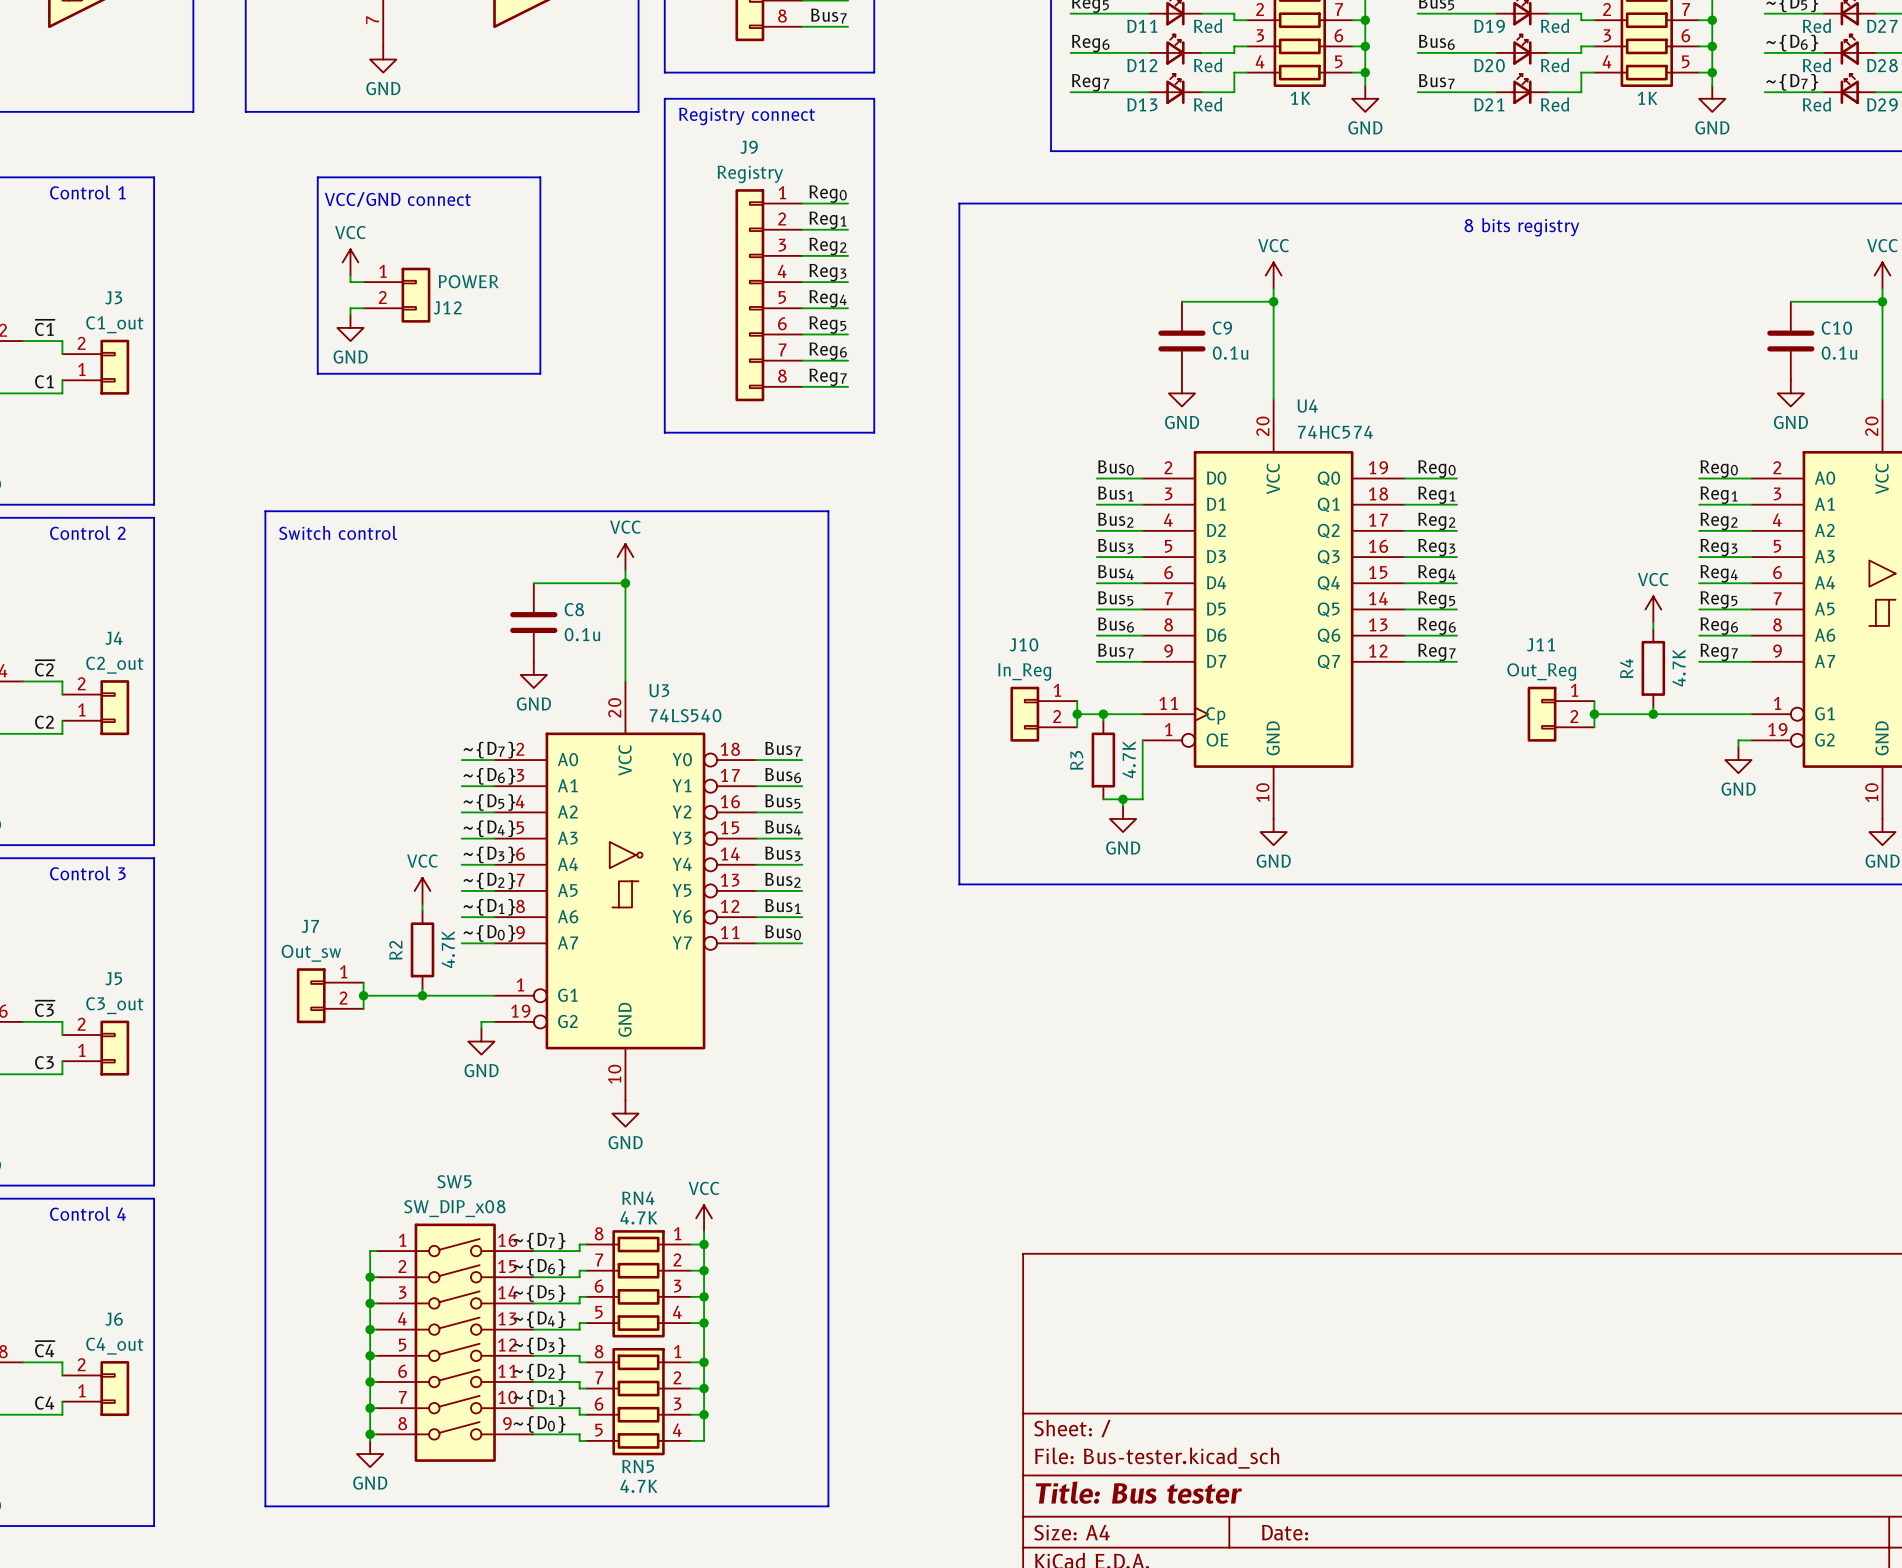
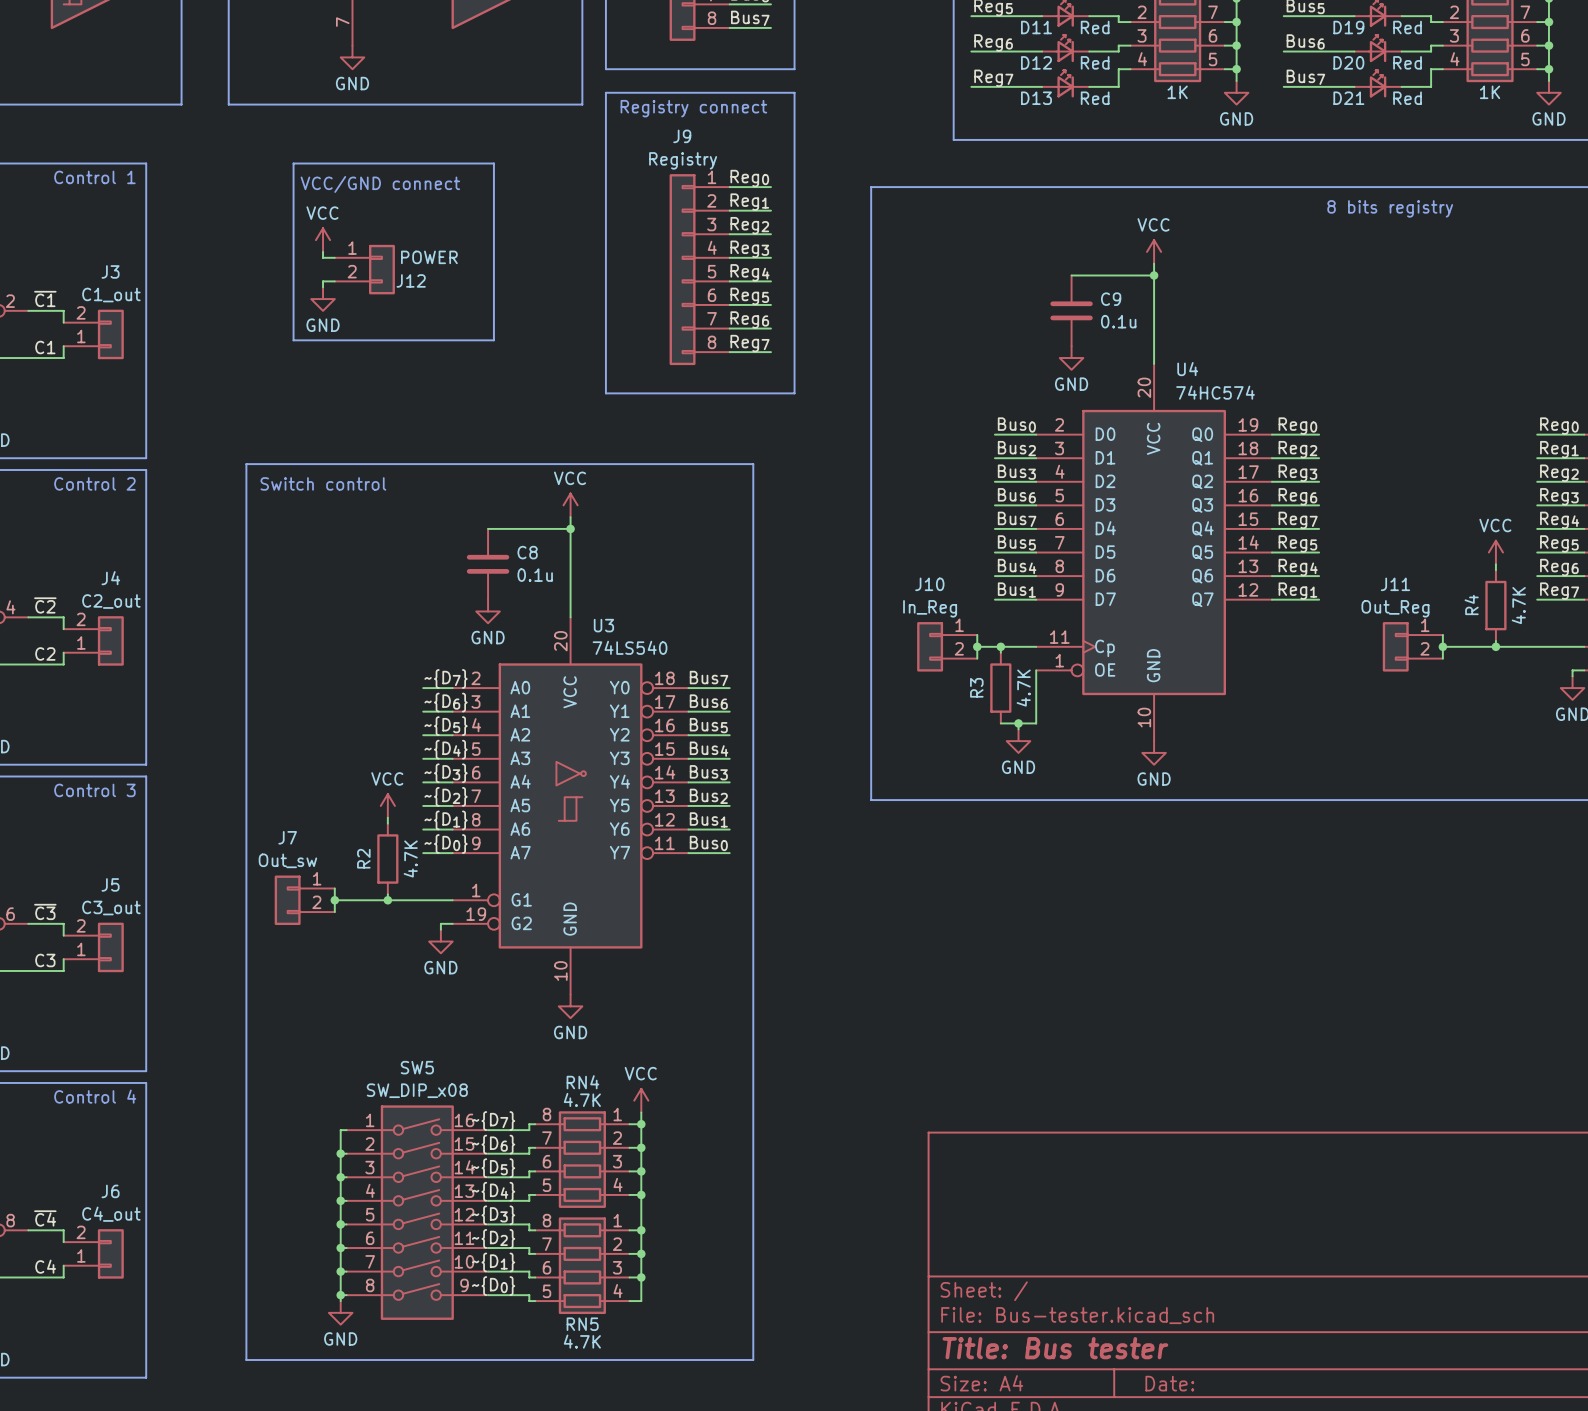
label: Bus1 (1115, 494) -> Bus2 (1016, 448)
label: Reg1 (1436, 495) -> Reg2 (1297, 449)
label: Bus2 (1115, 520) -> Bus3 (1016, 472)
label: Reg2 (1436, 521) -> Reg3 (1297, 473)
label: Bus3 (1115, 546) -> Bus6 (1016, 495)
label: Reg3 (1436, 547) -> Reg6 (1297, 496)
label: Bus4 (1115, 572) -> Bus7 (1017, 519)
label: Reg4 (1436, 573) -> Reg7 (1298, 520)
label: Bus6 (1116, 625) -> Bus4 (1017, 566)
label: Reg6 (1437, 626) -> Reg4 (1298, 567)
label: Bus7 (1115, 651) -> Bus1 (1016, 590)
label: Reg7 (1436, 652) -> Reg1 (1297, 591)

